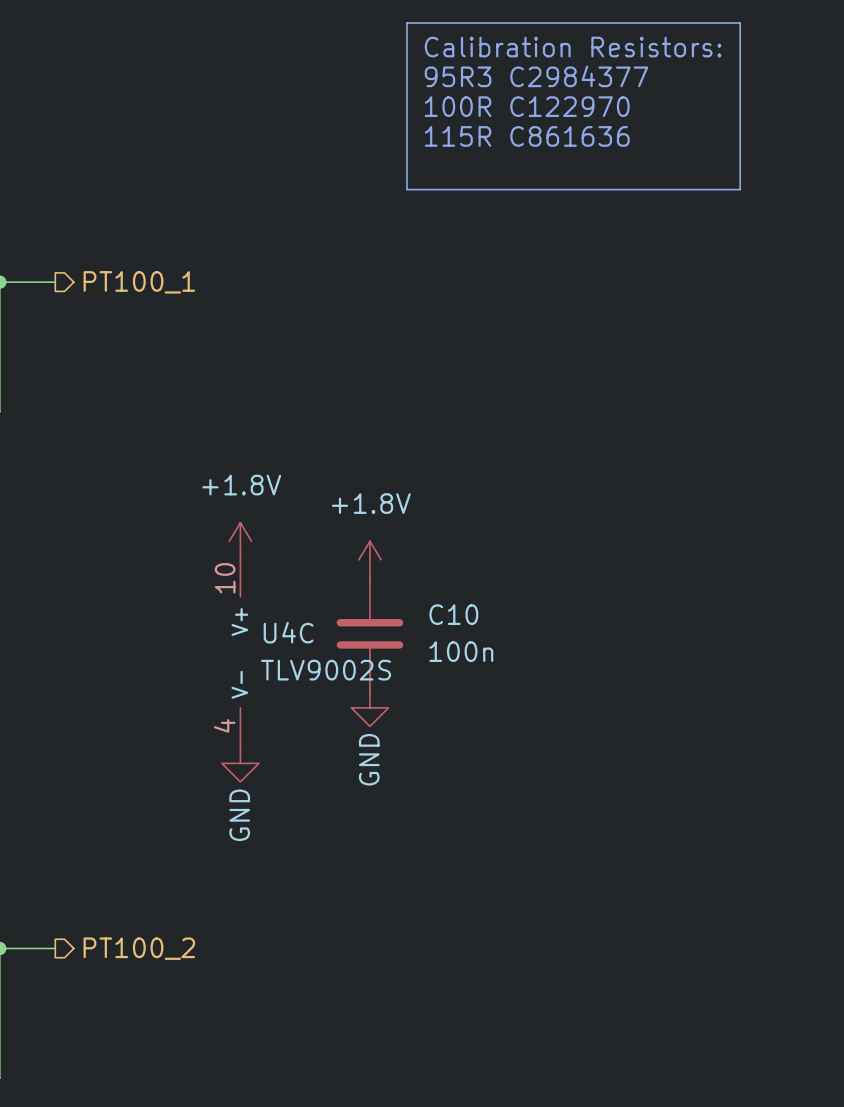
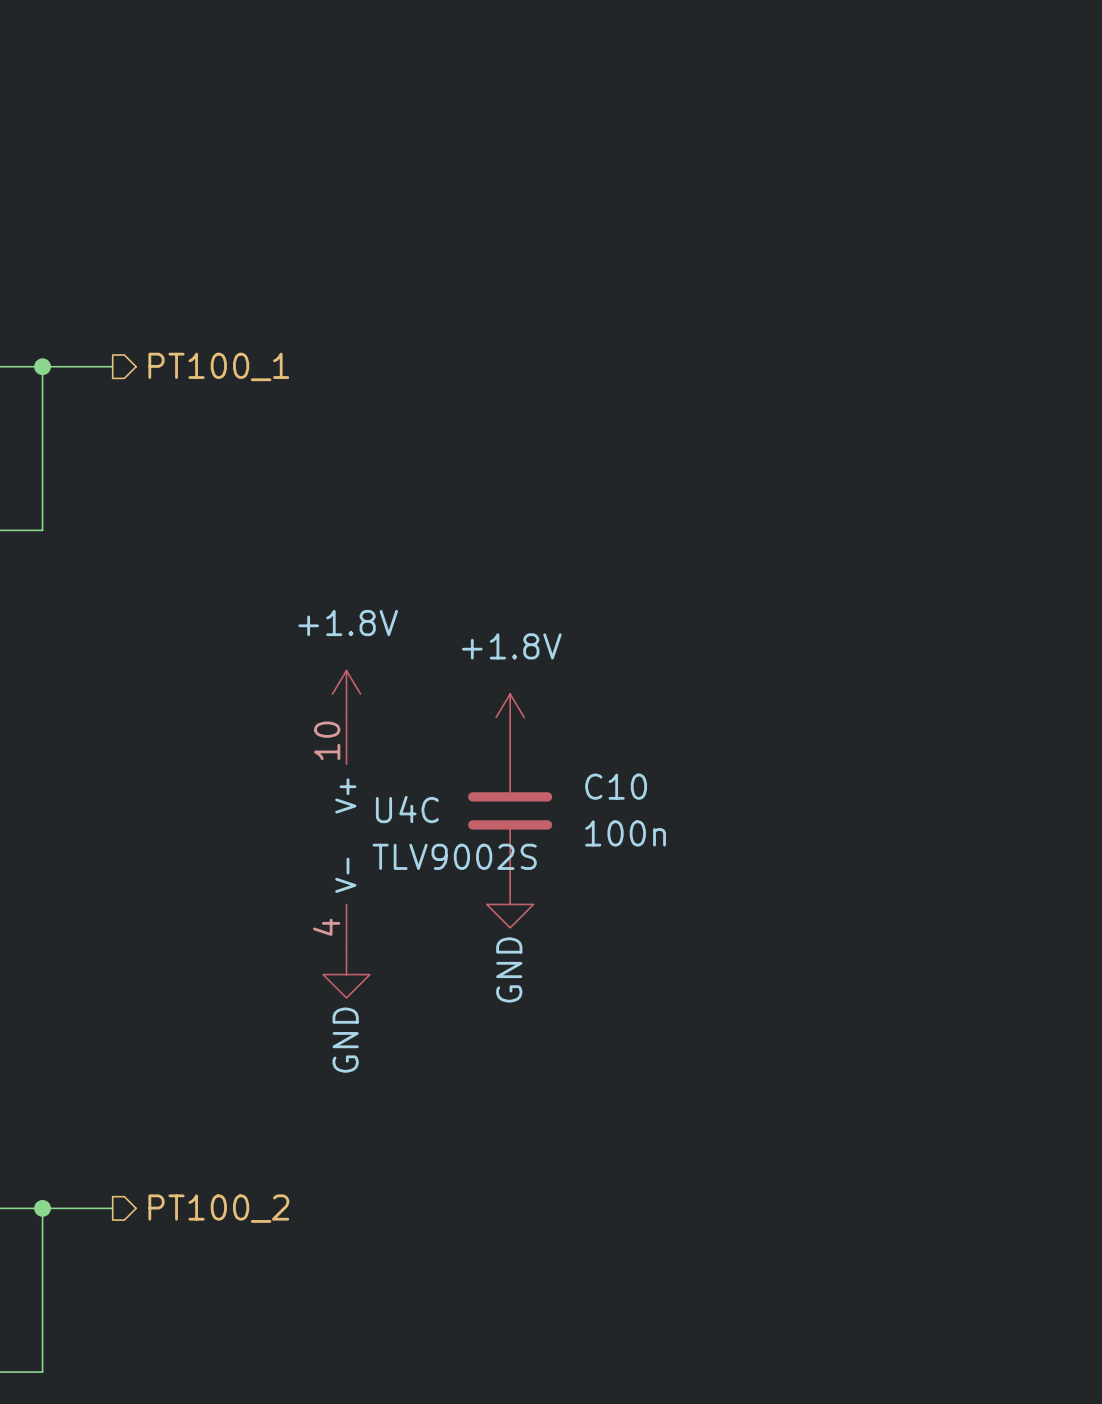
line: (406, 23) (740, 23) (740, 189) (406, 189) (406, 23) -> none
text: Calibration Resistors: (573, 47) -> none
text: 95R3 C2984377 (536, 76) -> none
text: 100R C122970 (527, 106) -> none
text: 115R C861636 (527, 136) -> none

